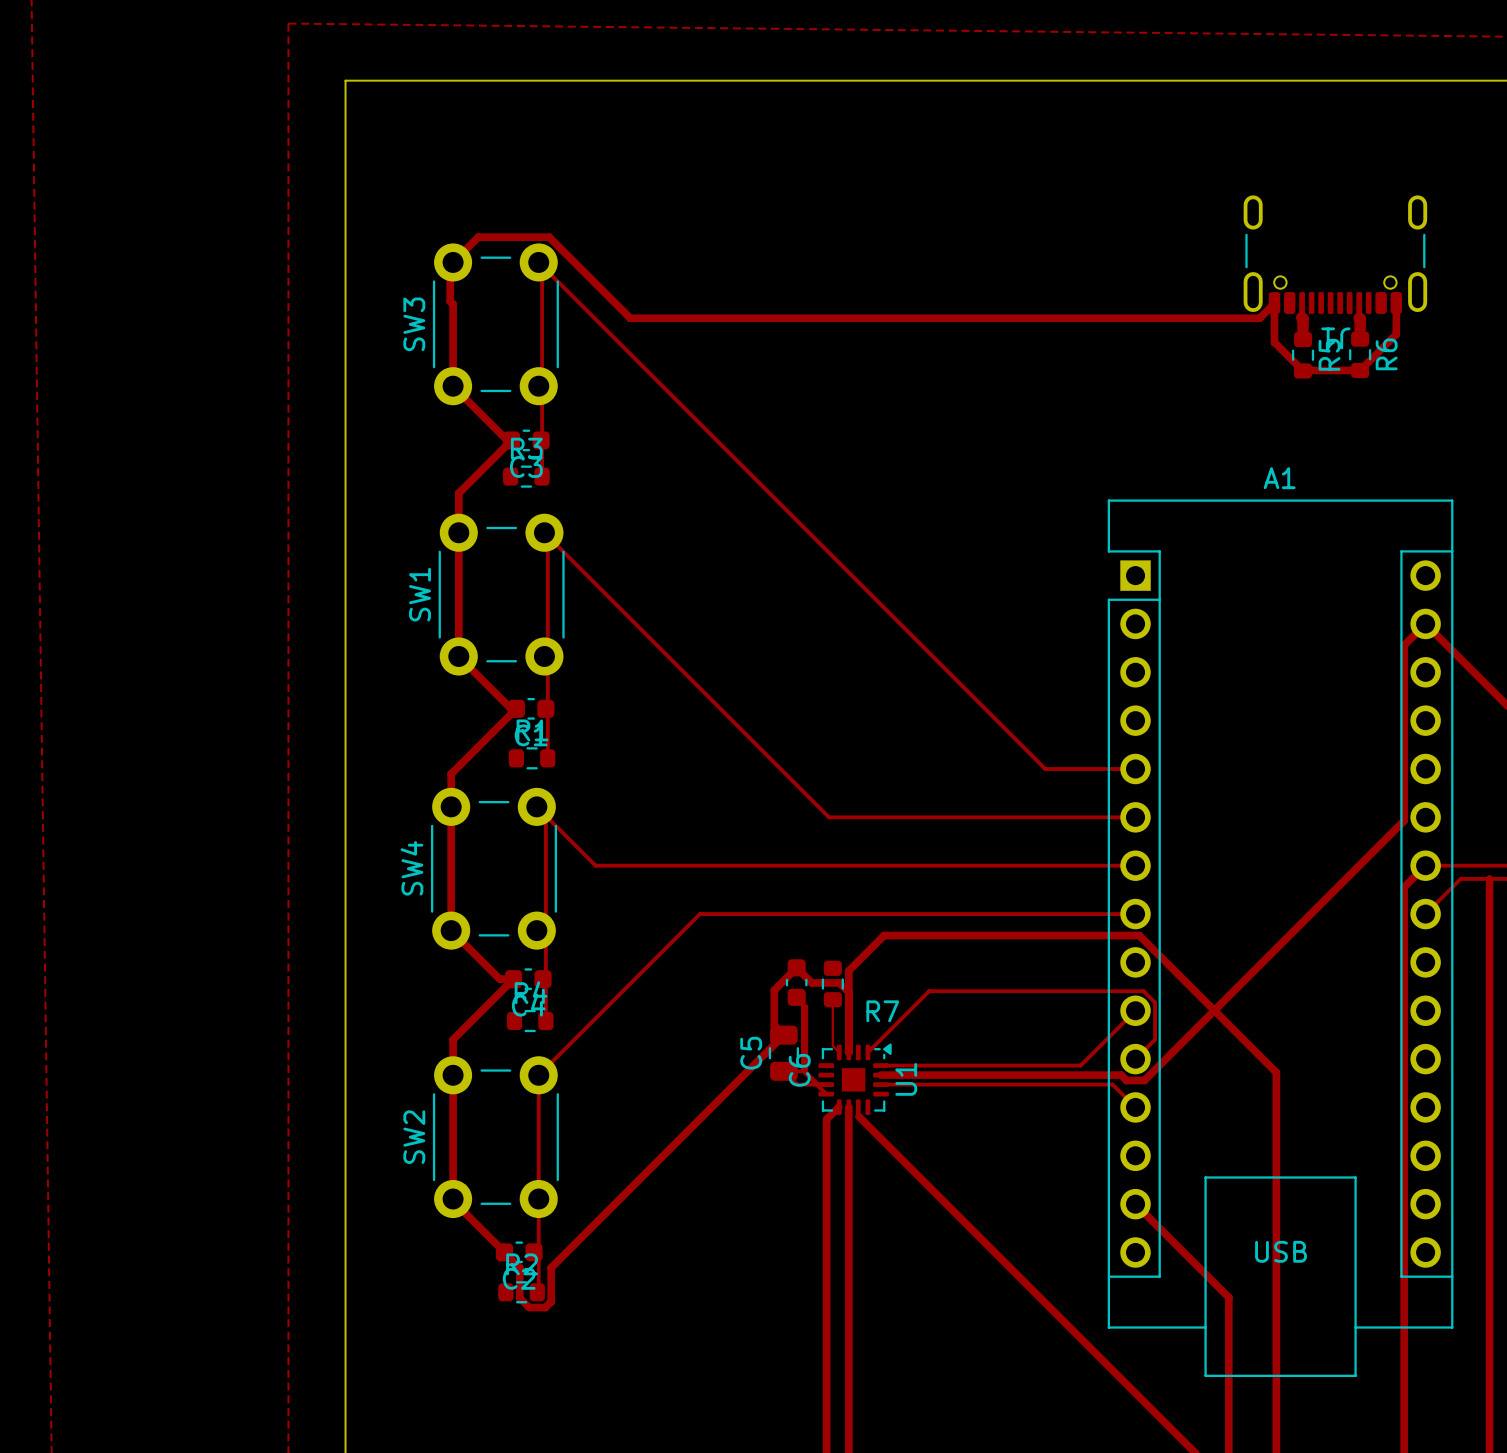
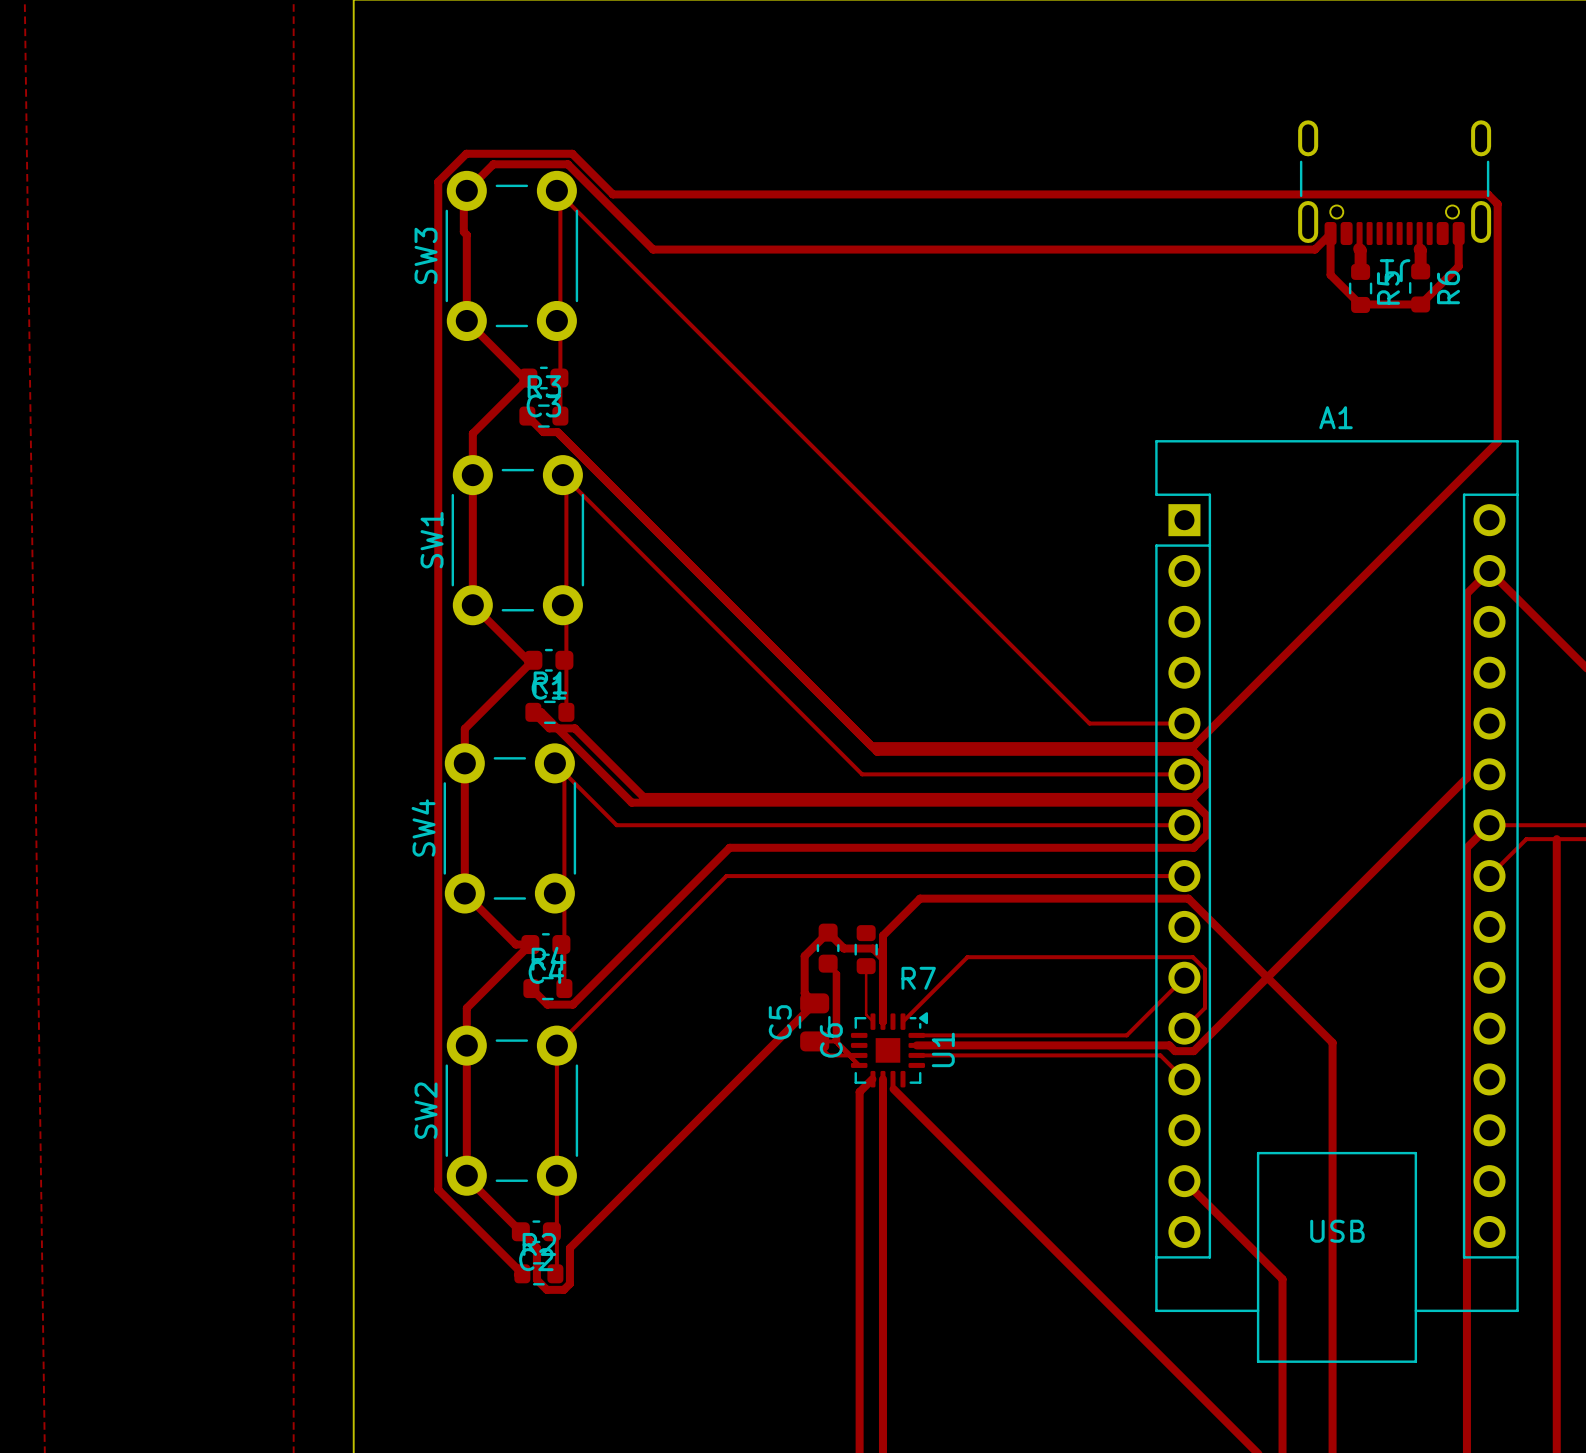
track: none -> (527, 416) (543, 432) (557, 432) (877, 751) (1193, 751) (1207, 765) (1207, 783) (1193, 796) (643, 796) (574, 728) (549, 728) (533, 712) (541, 712) (631, 802) (1193, 802) (1207, 815) (1207, 834) (1193, 847) (729, 847) (572, 1004) (547, 1004) (531, 988)
track: none -> (871, 746) (1193, 746) (1497, 442) (1497, 204) (1487, 194) (612, 194) (572, 153) (466, 153) (438, 181) (438, 1189) (522, 1273)

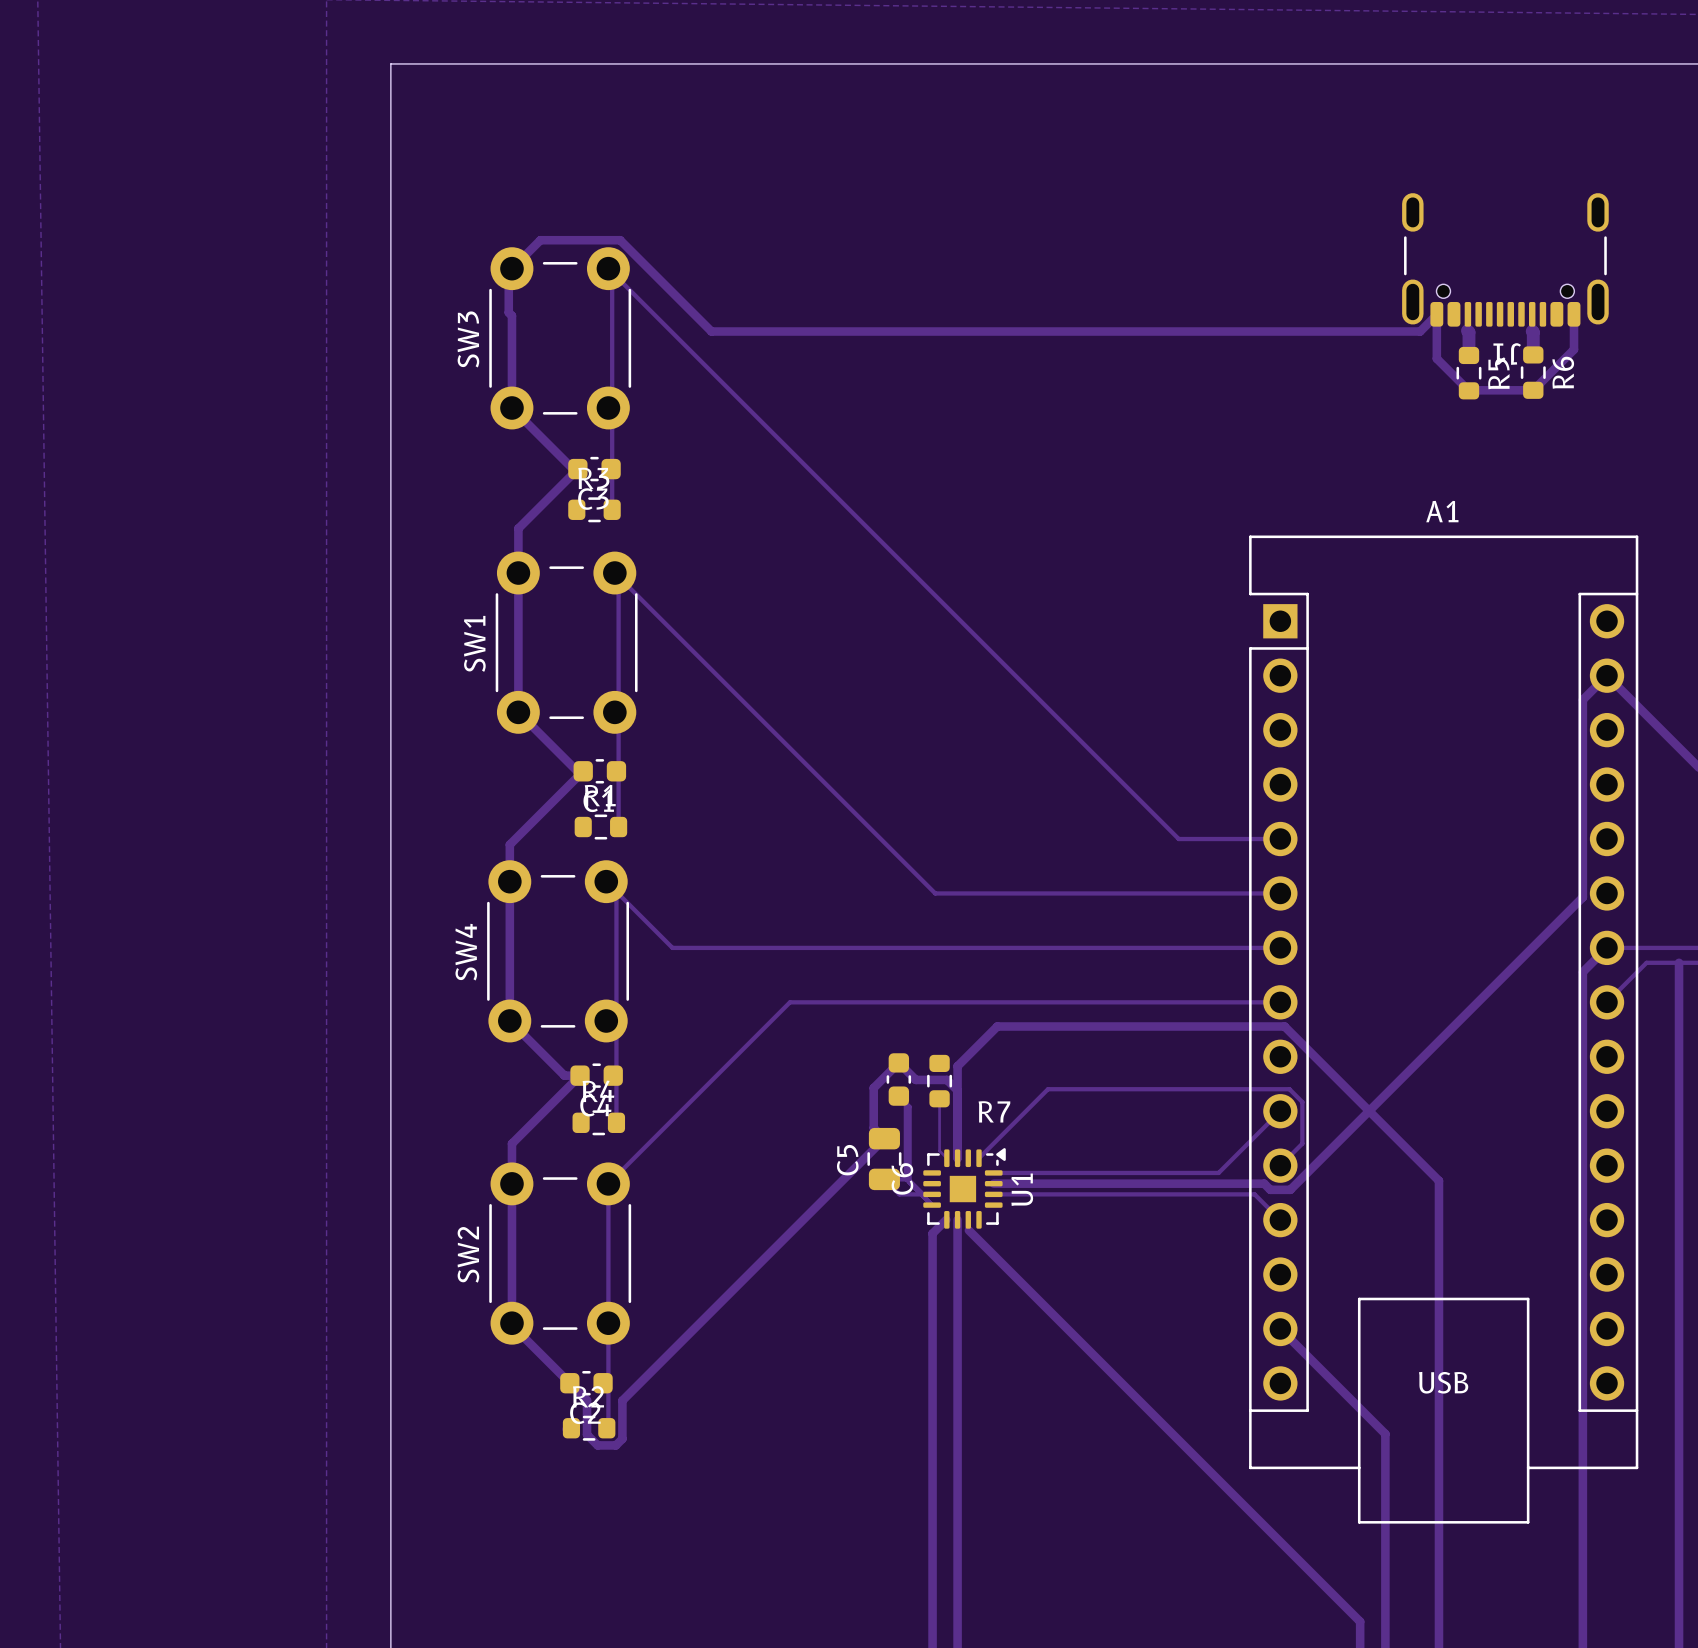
track: (527, 416) (543, 432) (557, 432) (877, 751) (1193, 751) (1207, 765) (1207, 783) (1193, 796) (643, 796) (574, 728) (549, 728) (533, 712) (541, 712) (631, 802) (1193, 802) (1207, 815) (1207, 834) (1193, 847) (729, 847) (572, 1004) (547, 1004) (531, 988) -> none
track: (871, 746) (1193, 746) (1497, 442) (1497, 204) (1487, 194) (612, 194) (572, 153) (466, 153) (438, 181) (438, 1189) (522, 1273) -> none

